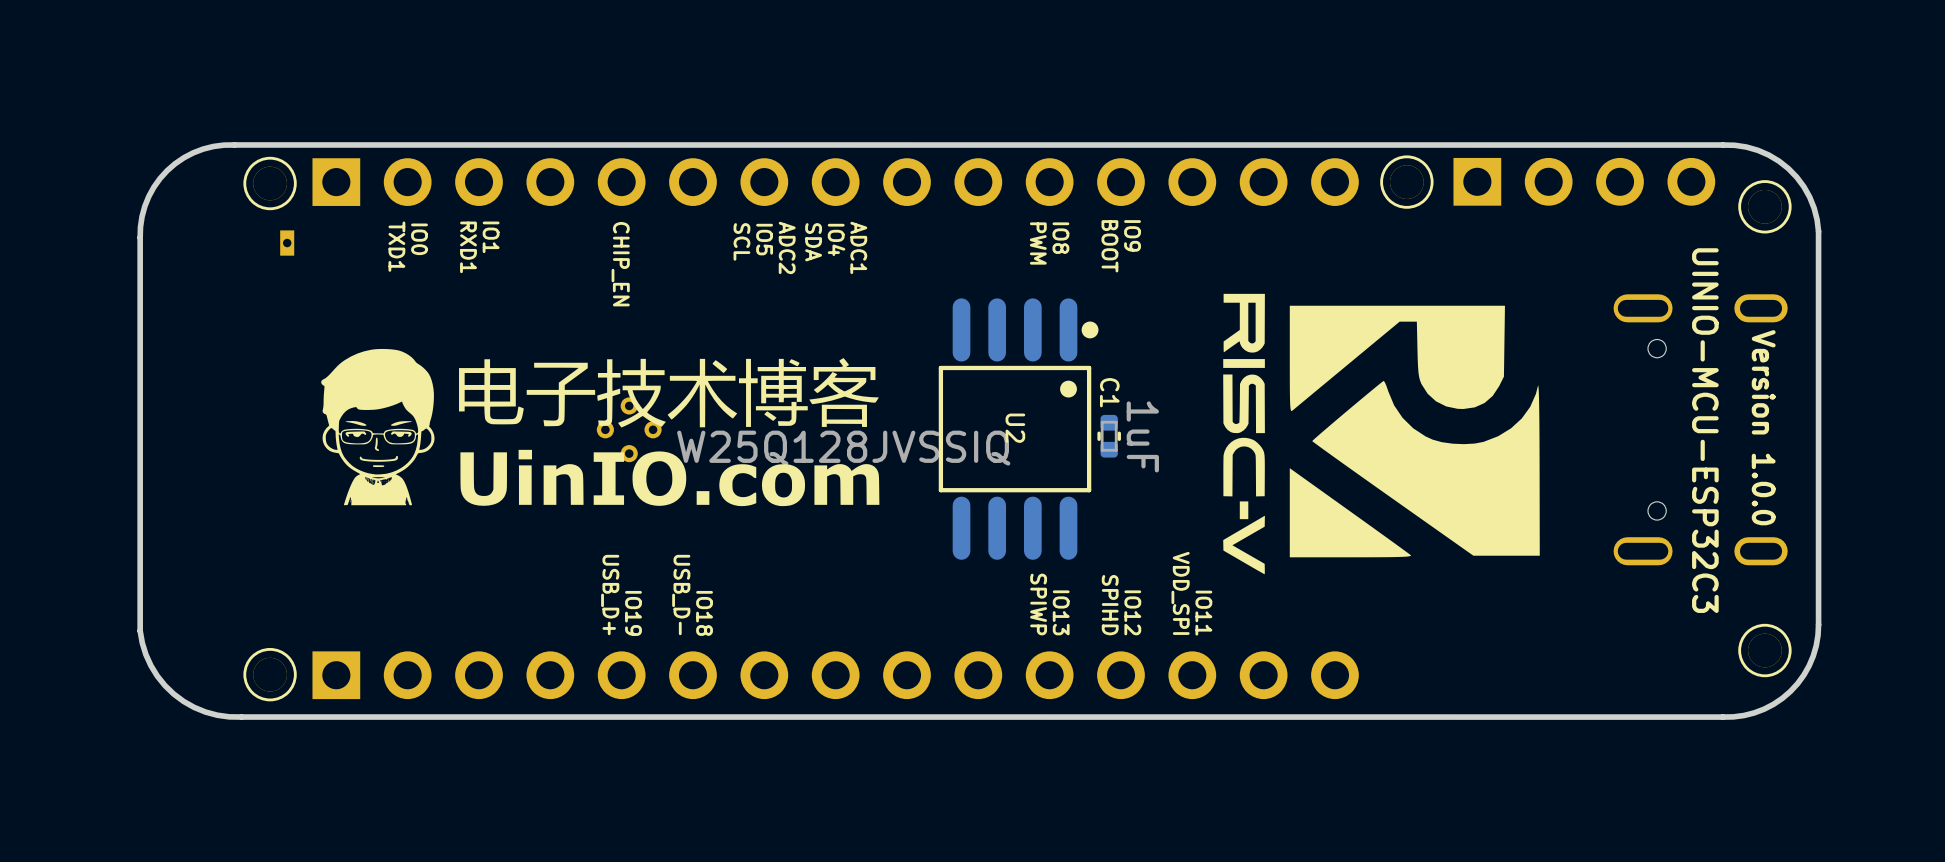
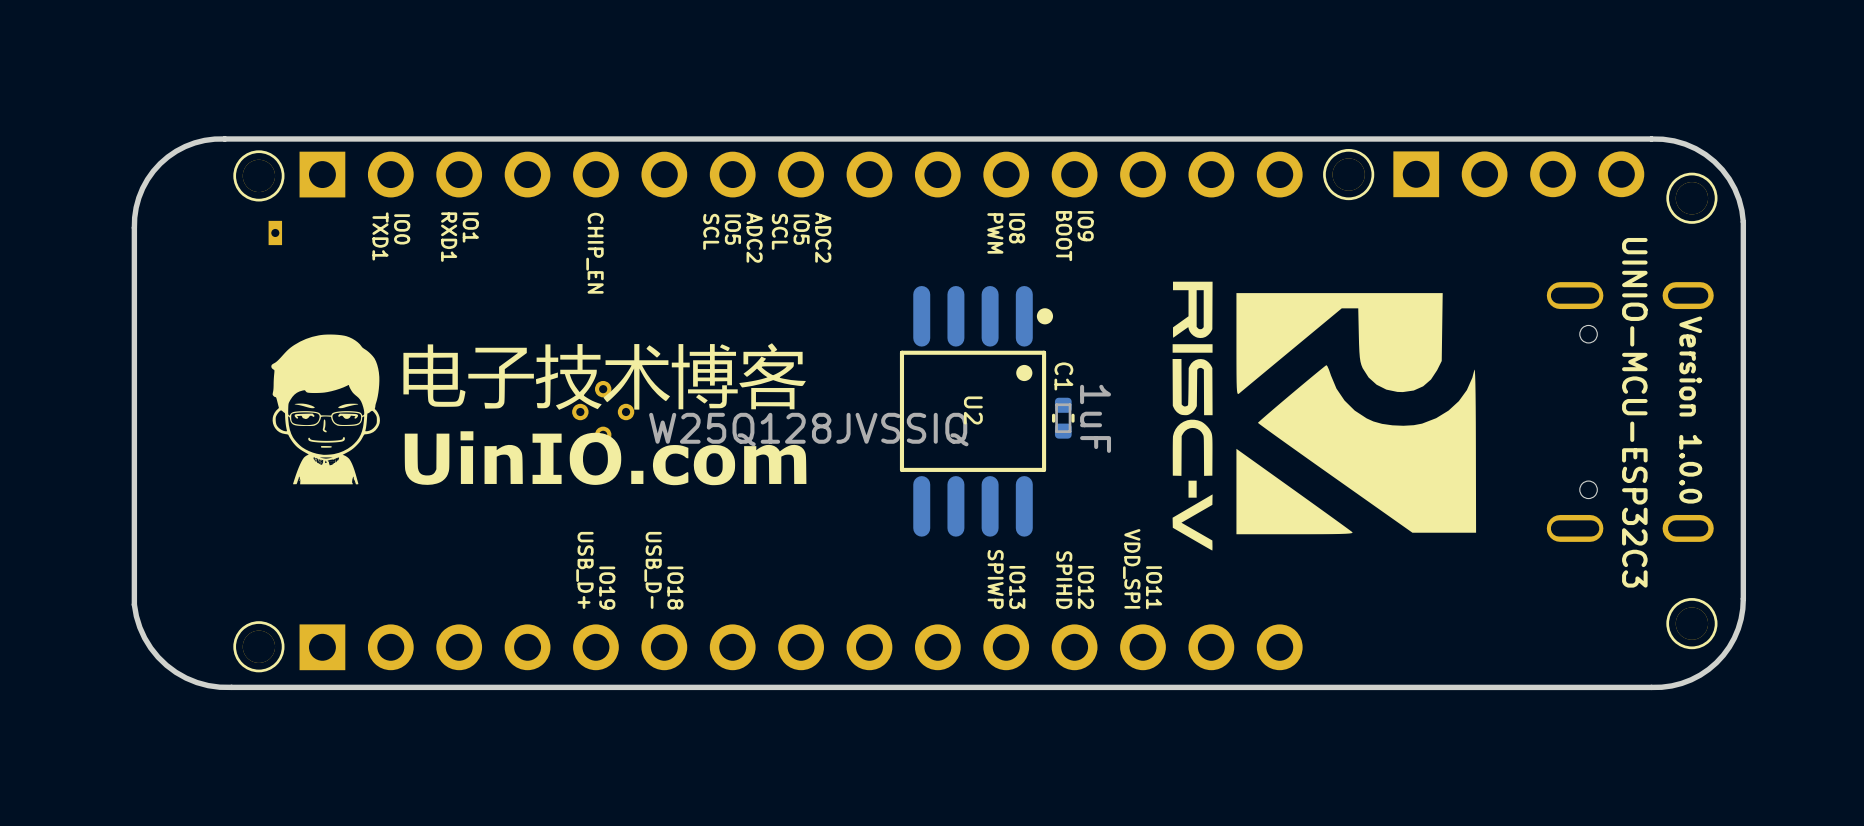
text: IO4 (836, 239) -> IO5 (801, 229)
text: SDA (813, 242) -> SCL (779, 231)
text: ADC1 (858, 247) -> ADC2 (823, 237)
drawing position: (600, 427) -> (538, 409)

